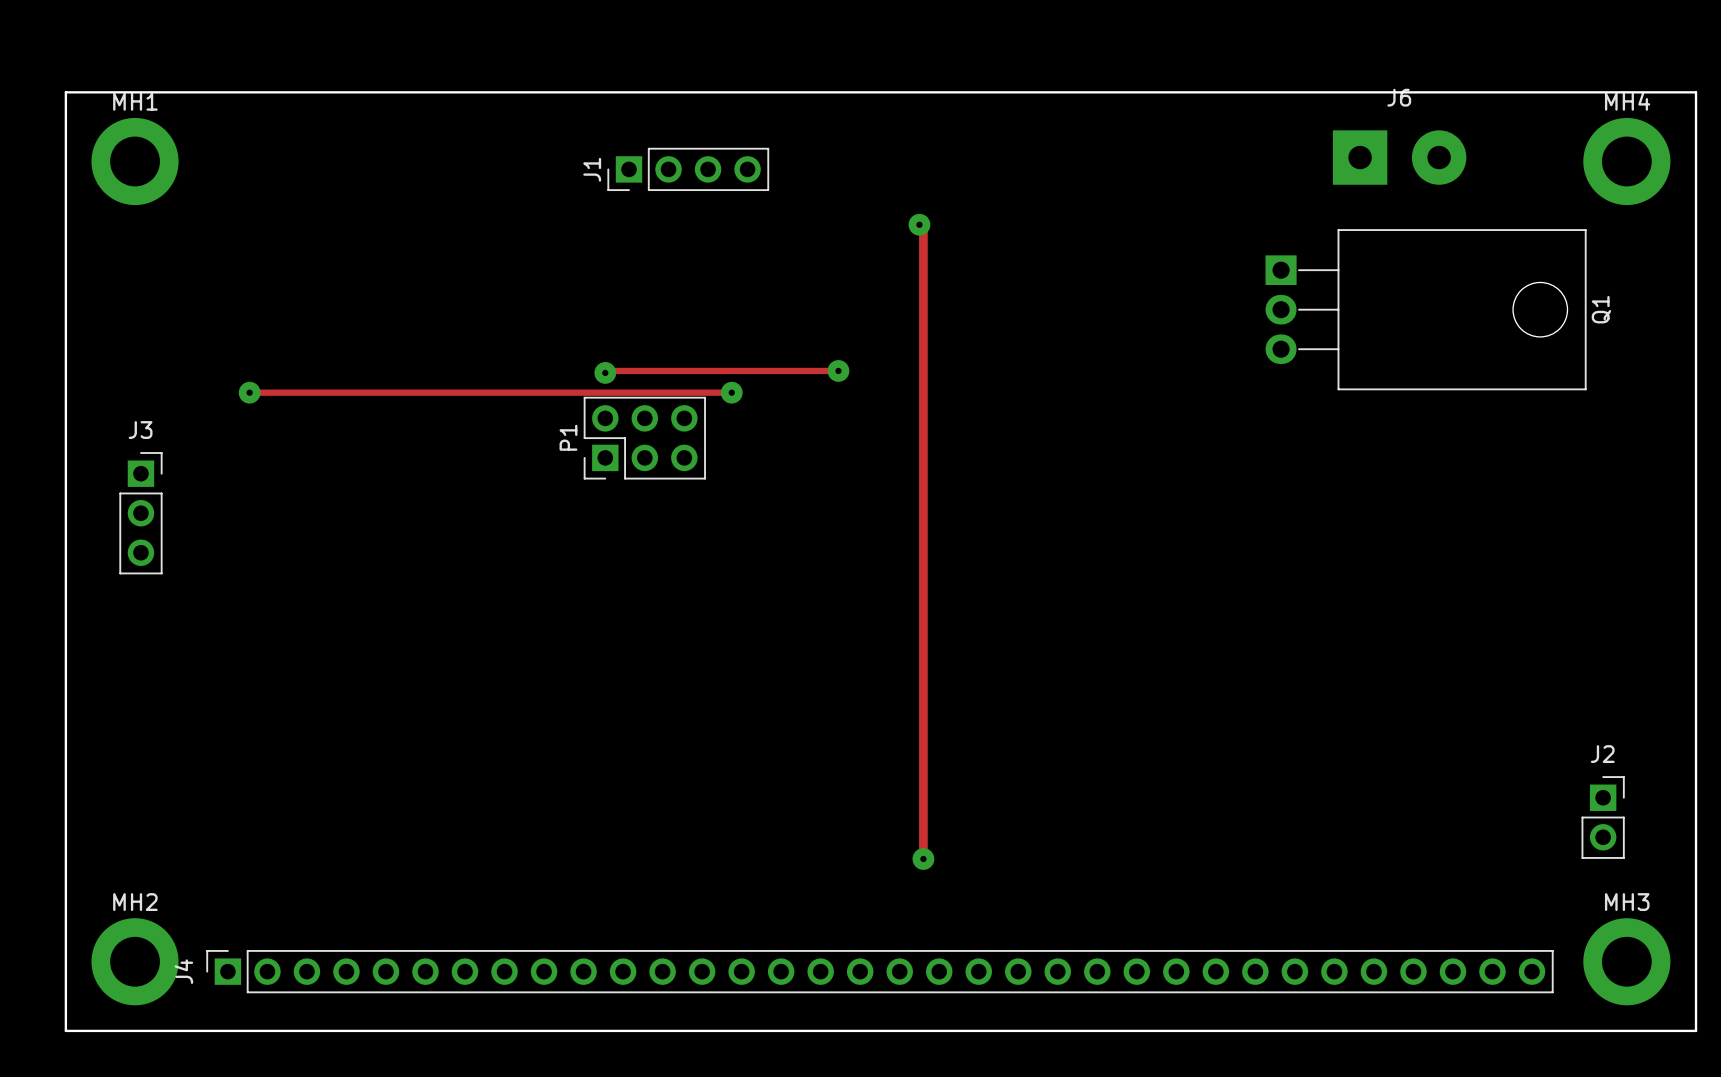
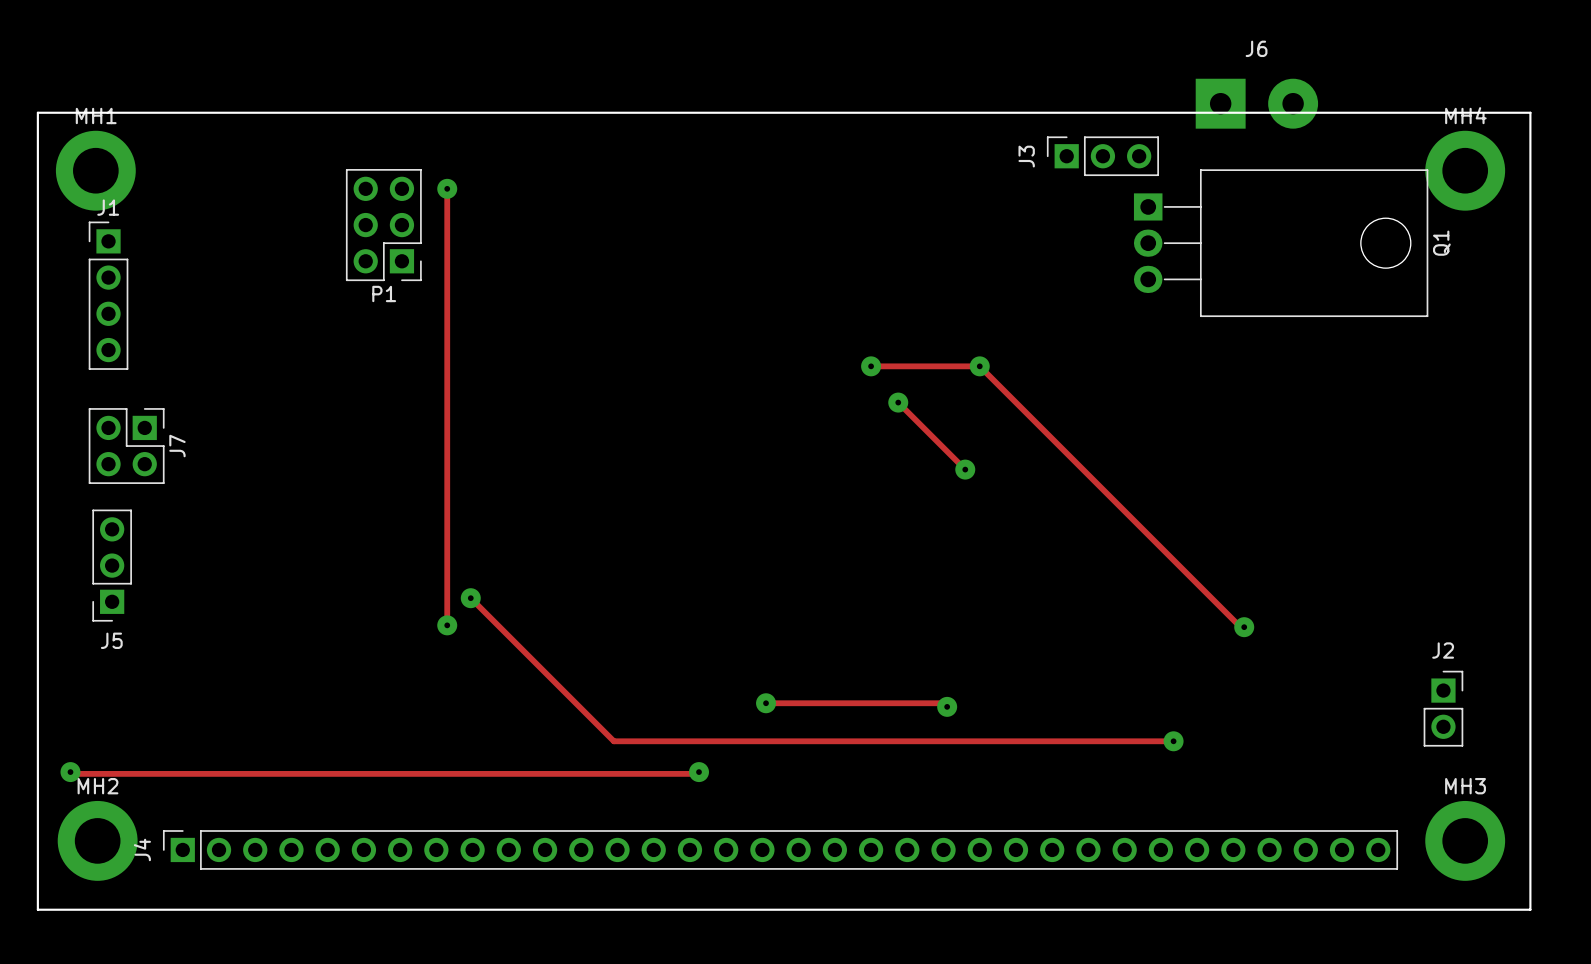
board edge: (65, 92) (65, 1030) (1696, 1030) (1696, 92) (65, 92) -> (37, 112) (37, 909) (1530, 909) (1530, 112) (37, 112)
MH1 position: (135, 161) -> (95, 170)
MH4 position: (1626, 161) -> (1465, 170)
J1 rotation: 0° (688, 169) -> 90° clockwise (108, 295)
J1 position: (688, 169) -> (108, 295)
track: (919, 224) (923, 228) (923, 859) -> none
via: (919, 224) -> none
track: none -> (447, 188) (447, 625)
via: none -> (447, 188)
track: (838, 370) (607, 370) (605, 372) -> none
via: (838, 370) -> none
via: (605, 372) -> none
track: (249, 392) (731, 392) -> none
via: (249, 392) -> none
via: (731, 392) -> none
P1 rotation: 0° (644, 438) -> 90° counterclockwise (383, 225)
P1 position: (644, 438) -> (383, 225)
track: none -> (871, 366) (979, 366) (1240, 627) (1244, 627)
via: none -> (871, 366)
via: none -> (979, 366)
track: none -> (898, 402) (965, 469)
via: none -> (898, 402)
J3 rotation: 0° (140, 513) -> 90° counterclockwise (1102, 156)
J3 position: (140, 513) -> (1102, 156)
J7: none -> (126, 446)
via: none -> (965, 469)
J5: none -> (112, 565)
track: none -> (470, 598) (613, 741) (1173, 741)
via: none -> (470, 598)
via: none -> (447, 625)
via: none -> (1244, 627)
track: none -> (766, 703) (943, 703) (947, 706)
via: none -> (766, 703)
via: none -> (947, 706)
via: none -> (1173, 741)
via: (923, 859) -> none
track: none -> (70, 772) (72, 773) (697, 773) (699, 772)
via: none -> (70, 772)
via: none -> (699, 772)

